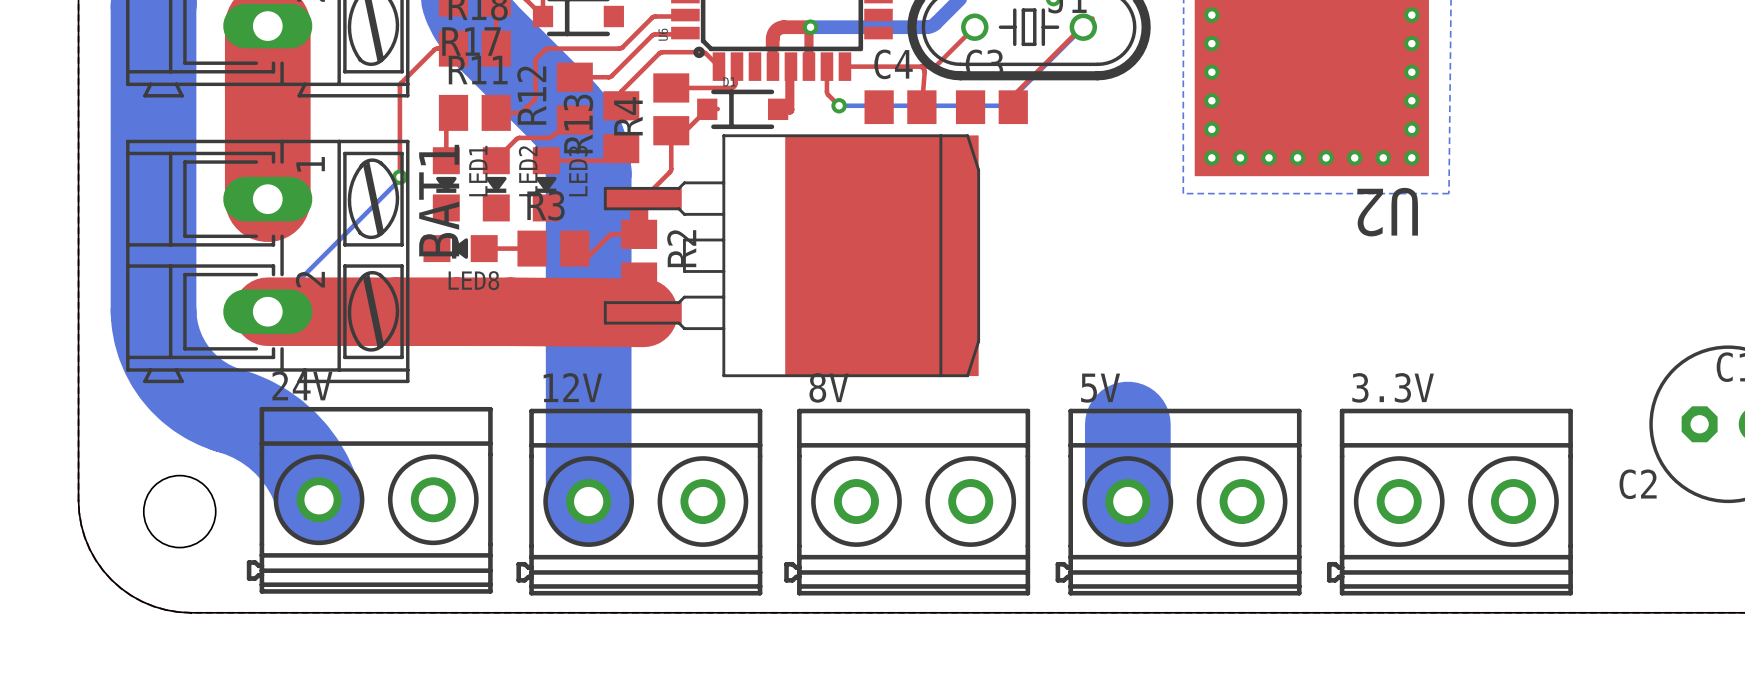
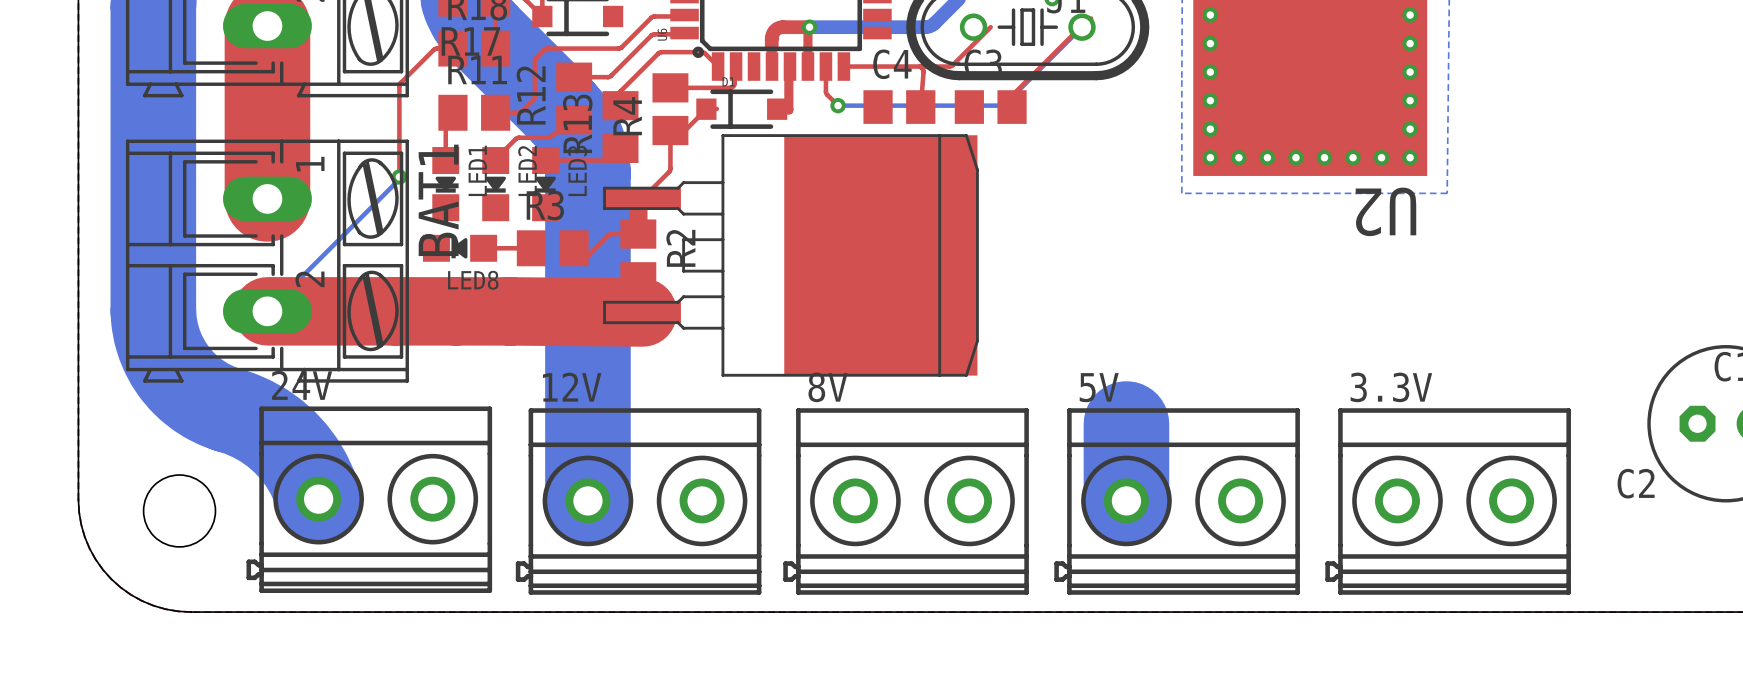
top track: (974, 27) (933, 66) -> (990, 27) (952, 65) (932, 66)

